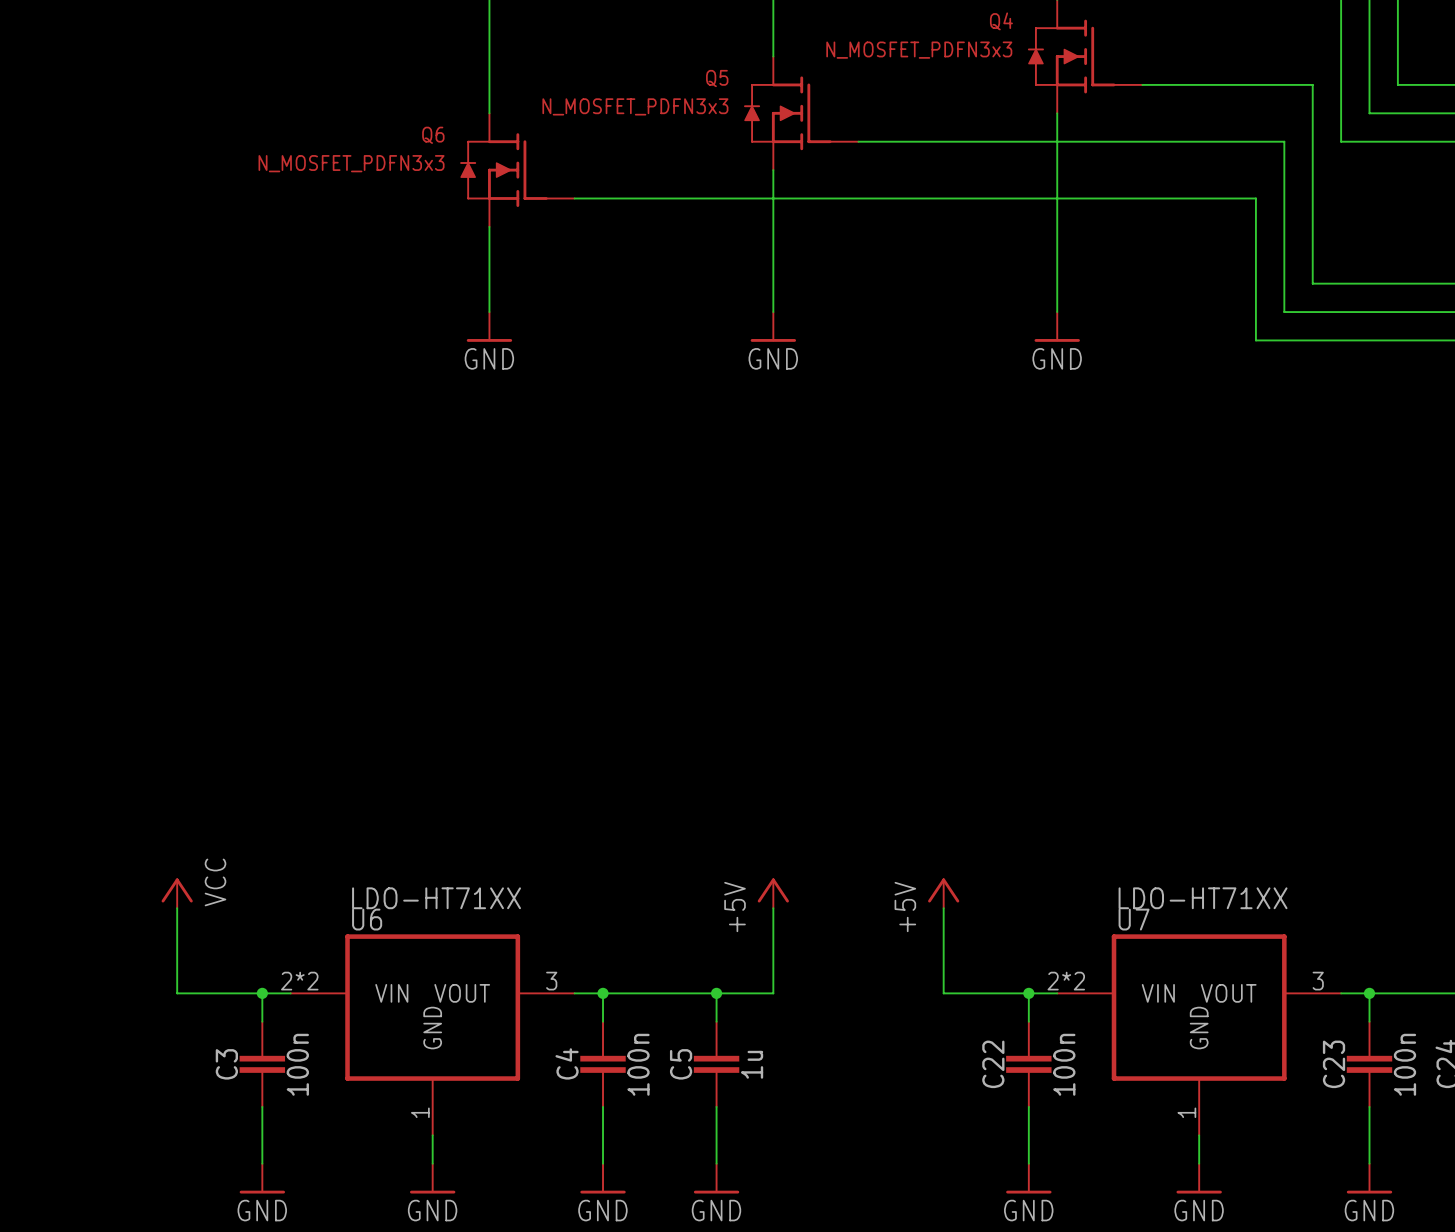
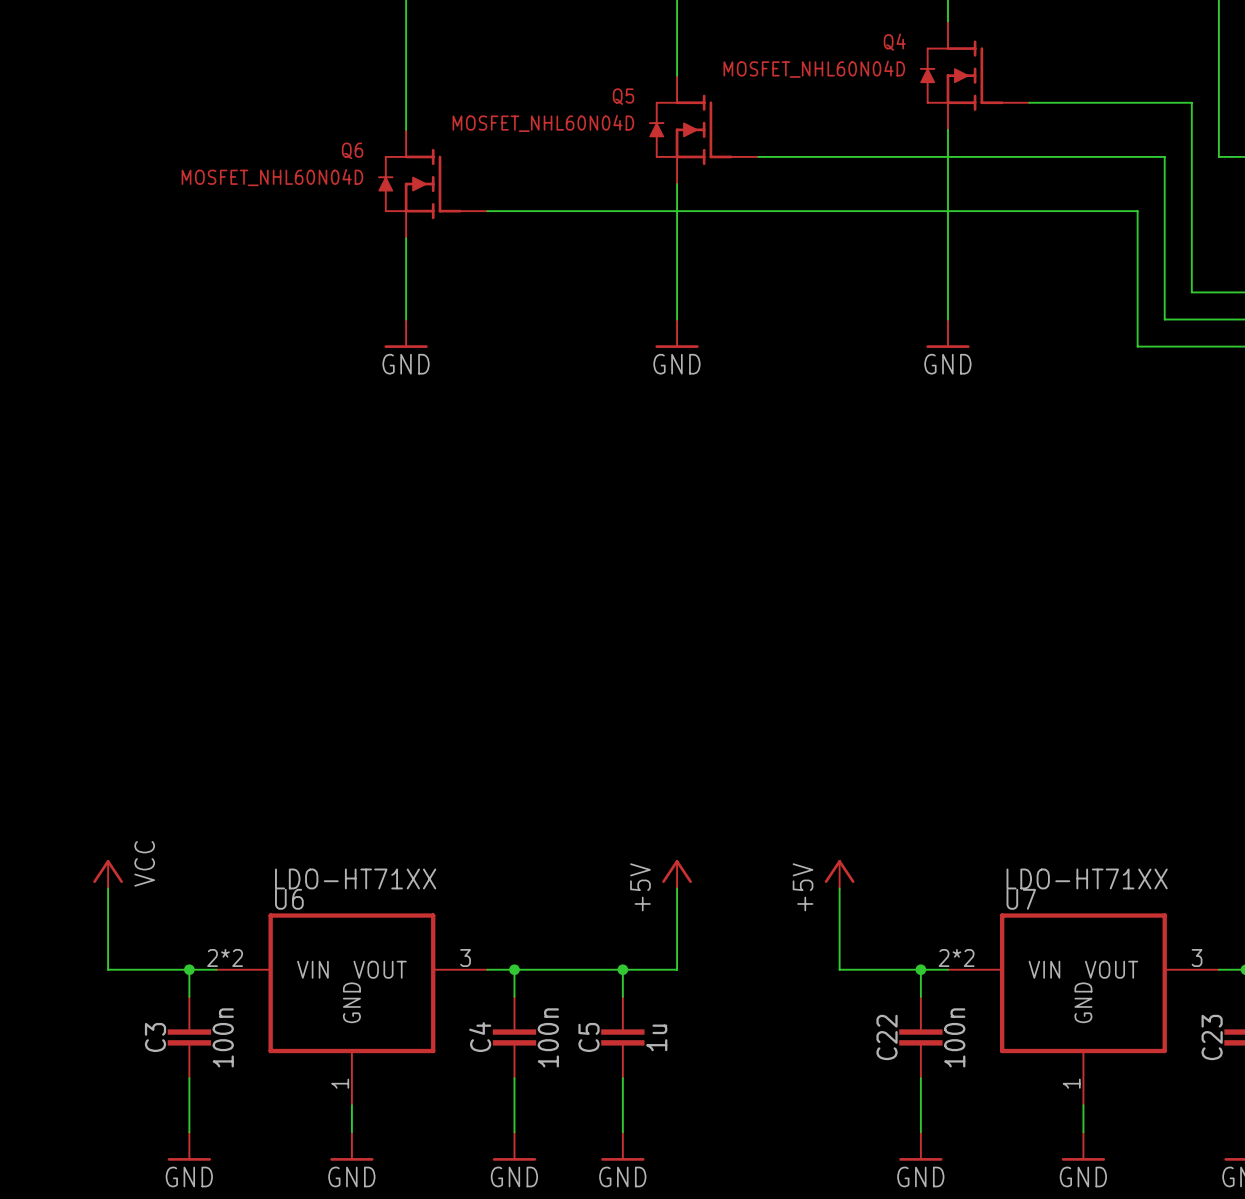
Q4 value: N_MOSFET_PDFN3x3 (919, 50) -> MOSFET_NHL60N04D (814, 69)
Q5 value: N_MOSFET_PDFN3x3 (635, 106) -> MOSFET_NHL60N04D (543, 123)
Q6 value: N_MOSFET_PDFN3x3 (351, 163) -> MOSFET_NHL60N04D (272, 177)

